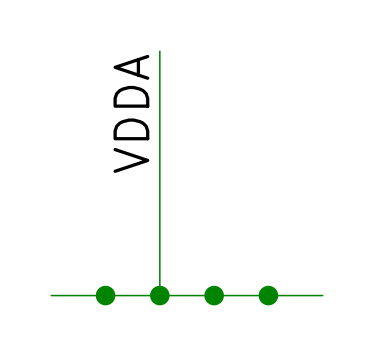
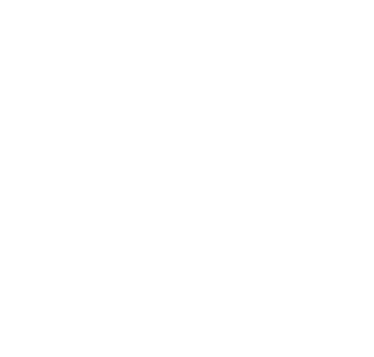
wire: (159, 51) (159, 295) -> none
label: VDDA (131, 113) -> none
wire: (51, 295) (322, 295) -> none
junction: (105, 295) -> none
junction: (159, 295) -> none
junction: (214, 295) -> none
junction: (268, 295) -> none

